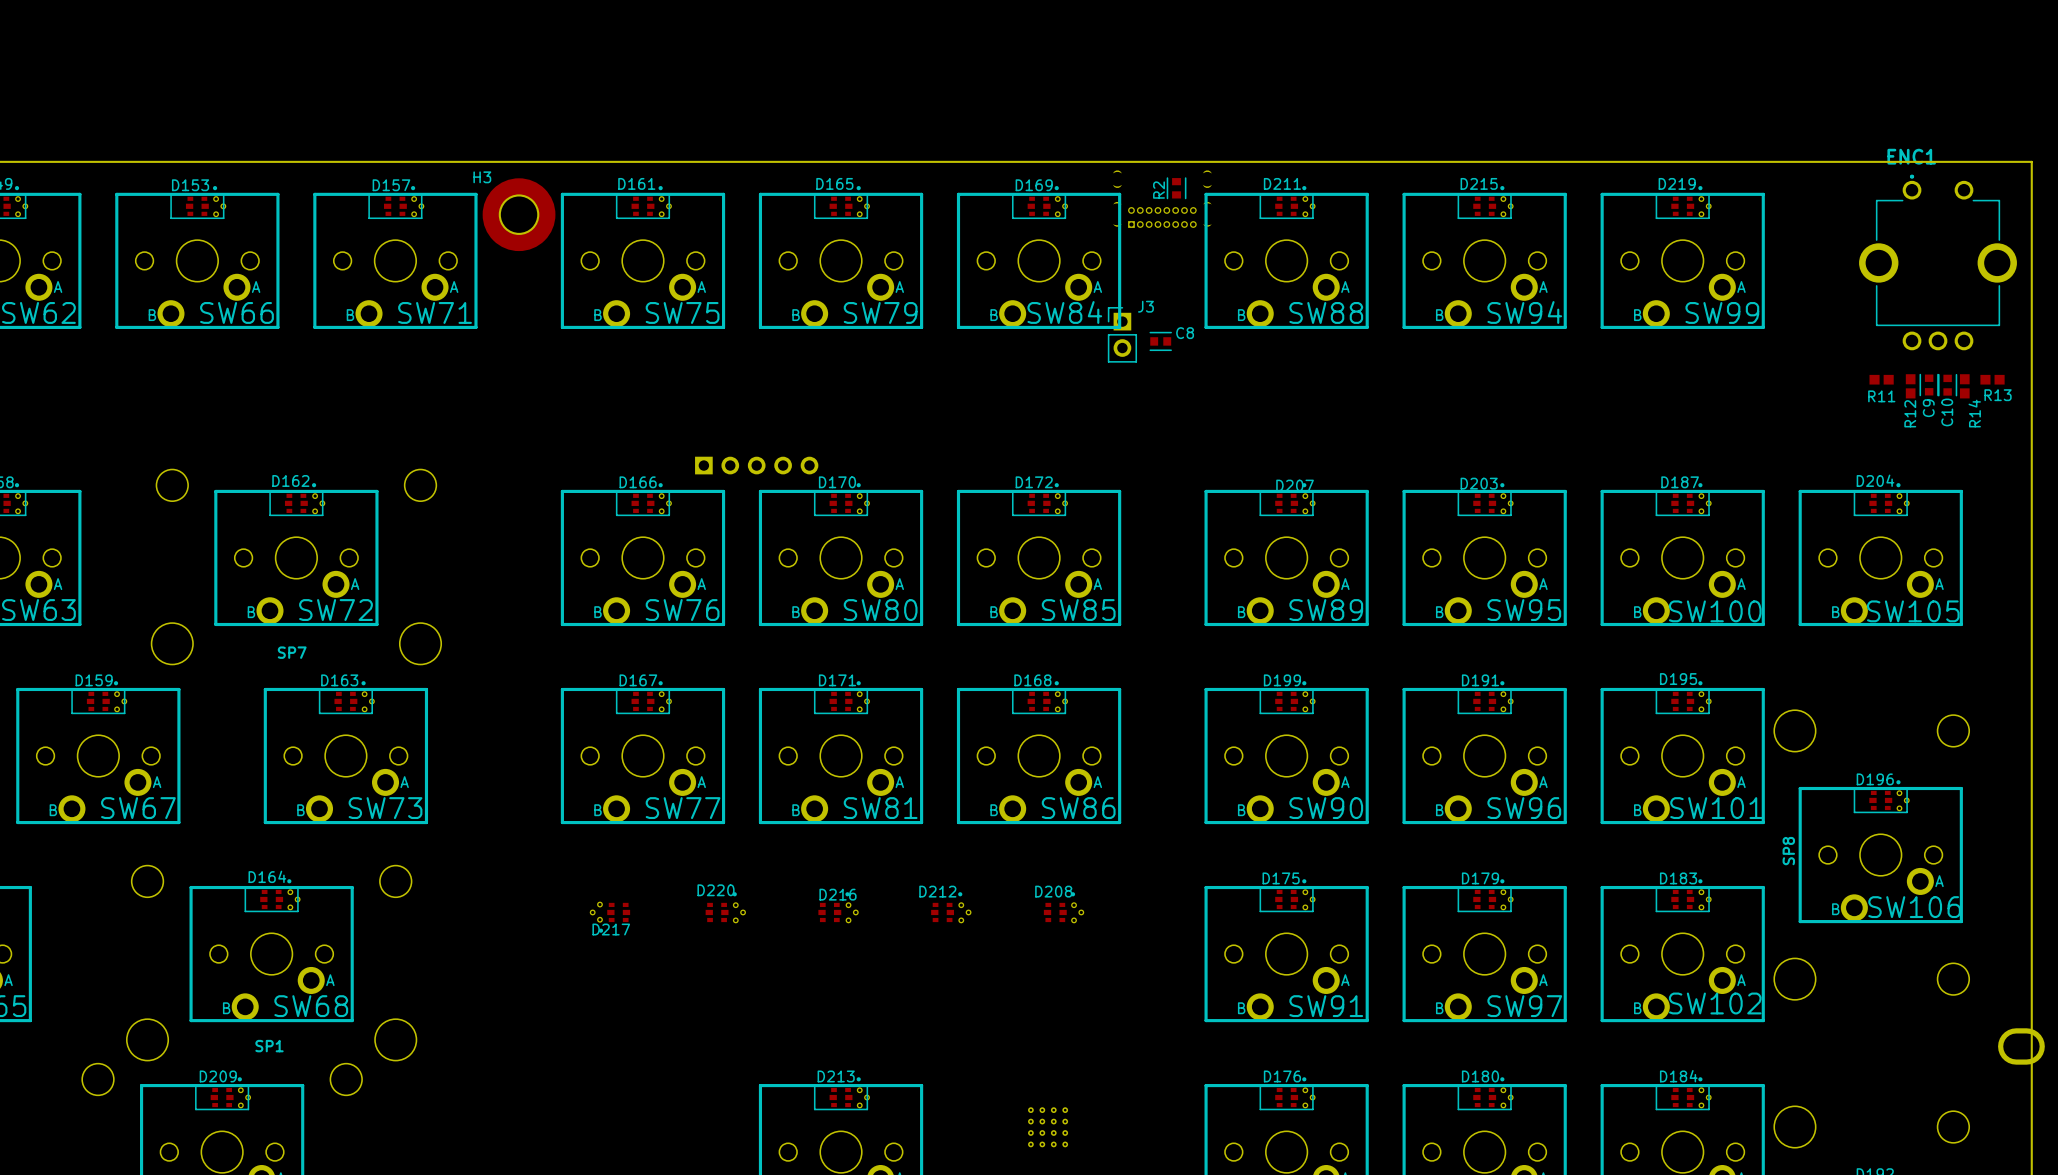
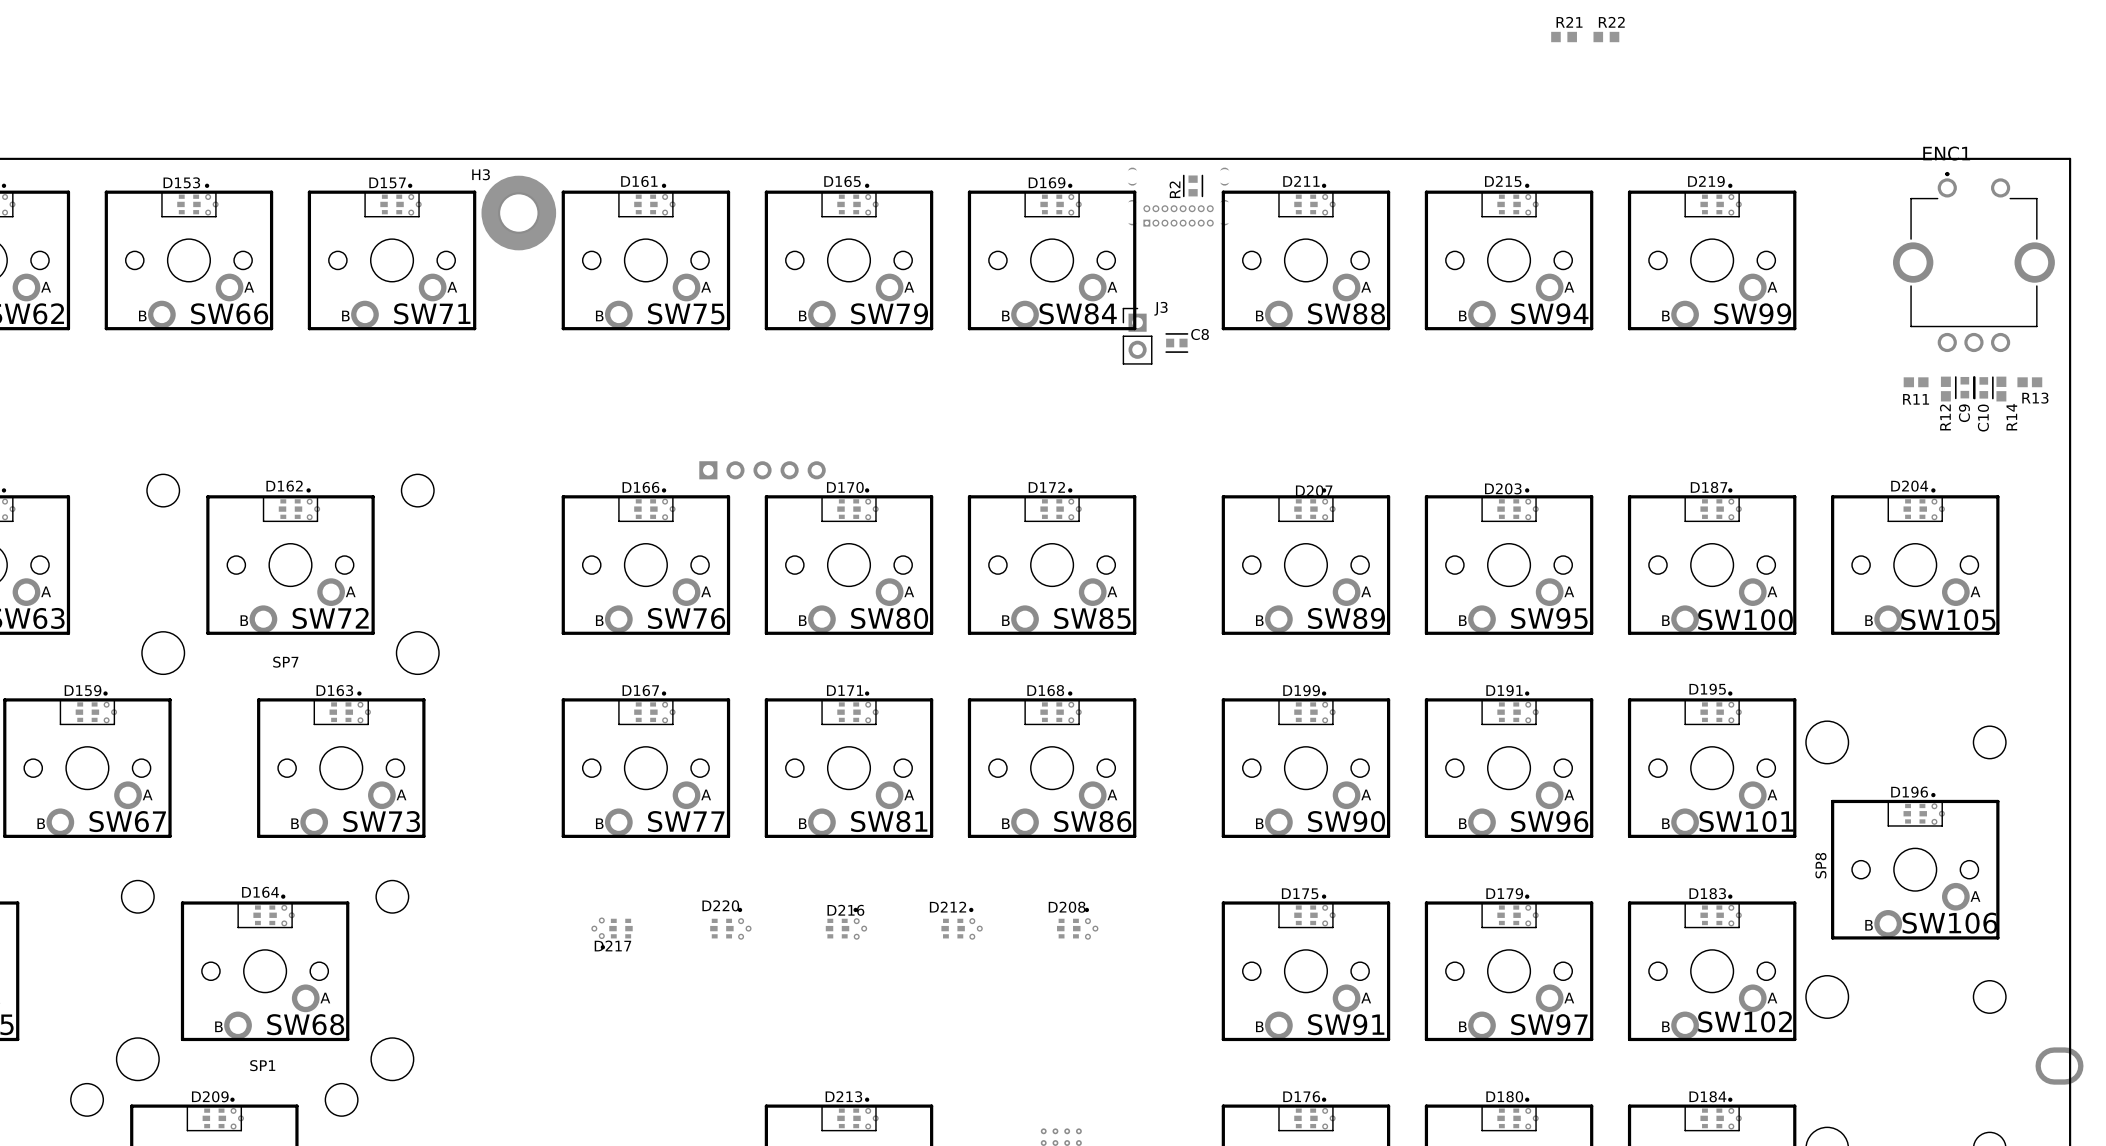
R21: none -> (1564, 37)
R22: none -> (1606, 37)

